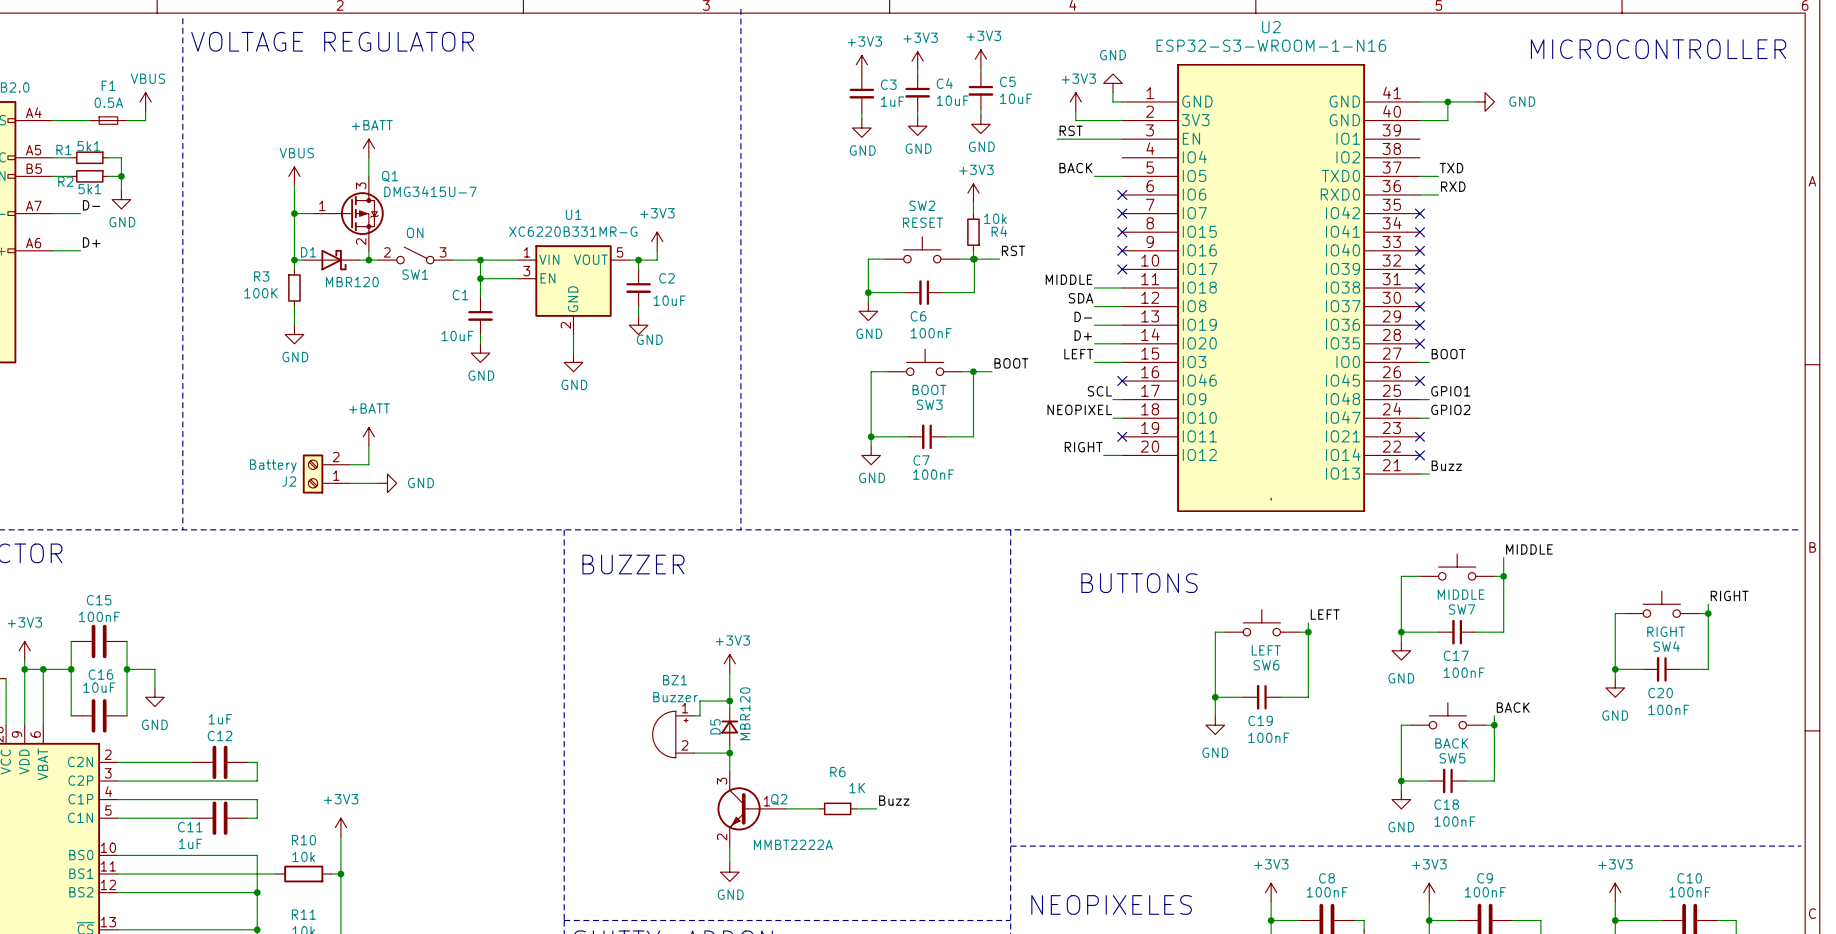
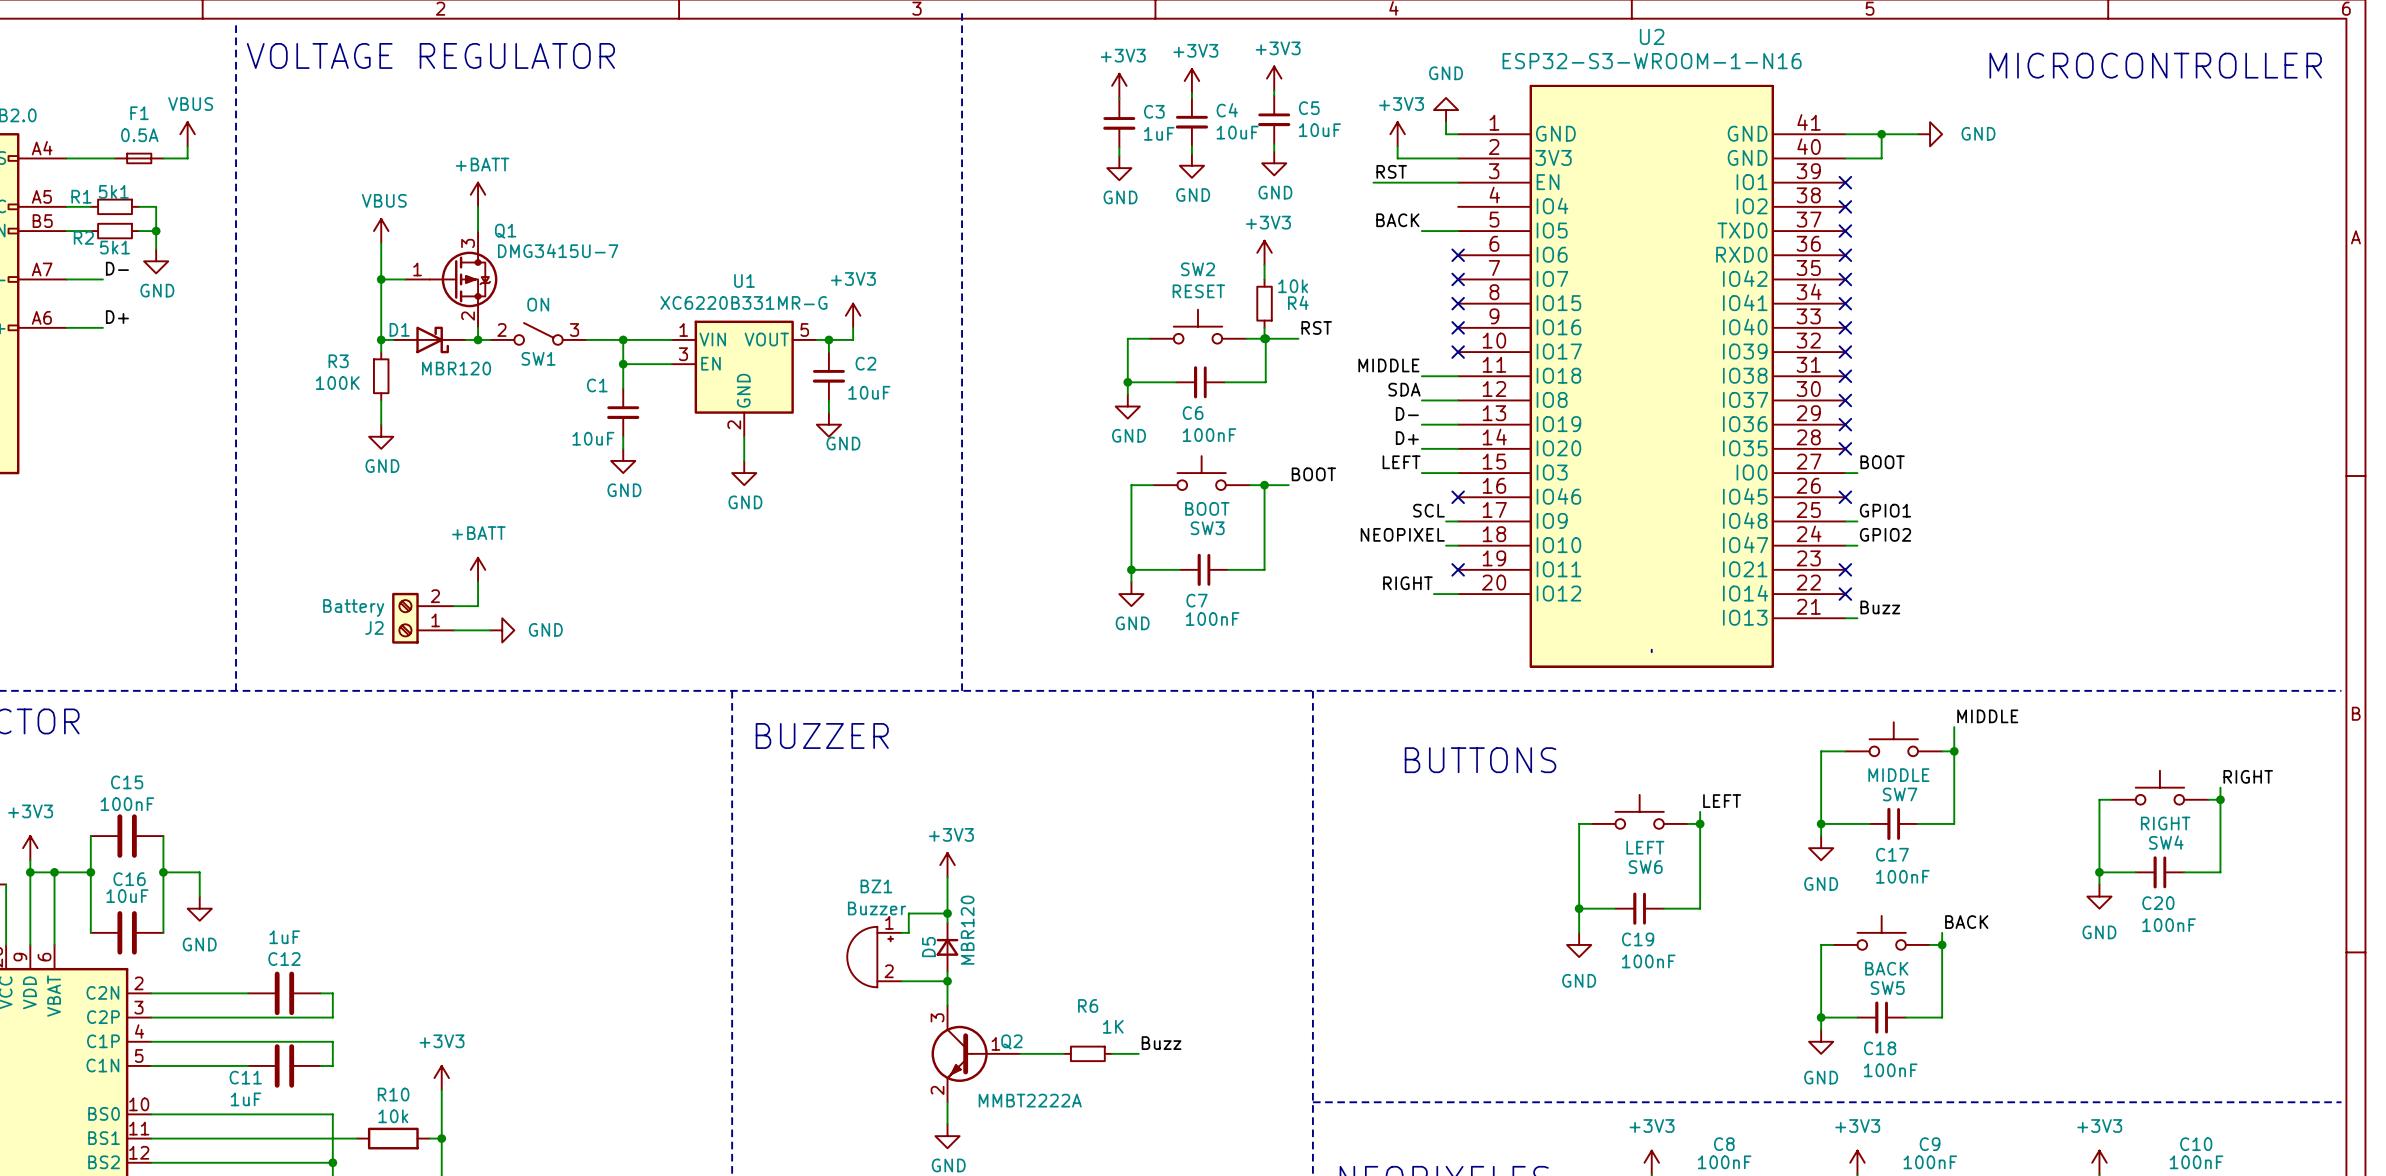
no-connect mark: none -> (1845, 182)
no-connect mark: none -> (1845, 206)
label: TXD (1451, 168) -> none
wire: (1419, 176) (1438, 176) -> none
no-connect mark: none -> (1845, 231)
label: RXD (1453, 186) -> none
wire: (1419, 194) (1438, 194) -> none
no-connect mark: none -> (1845, 255)

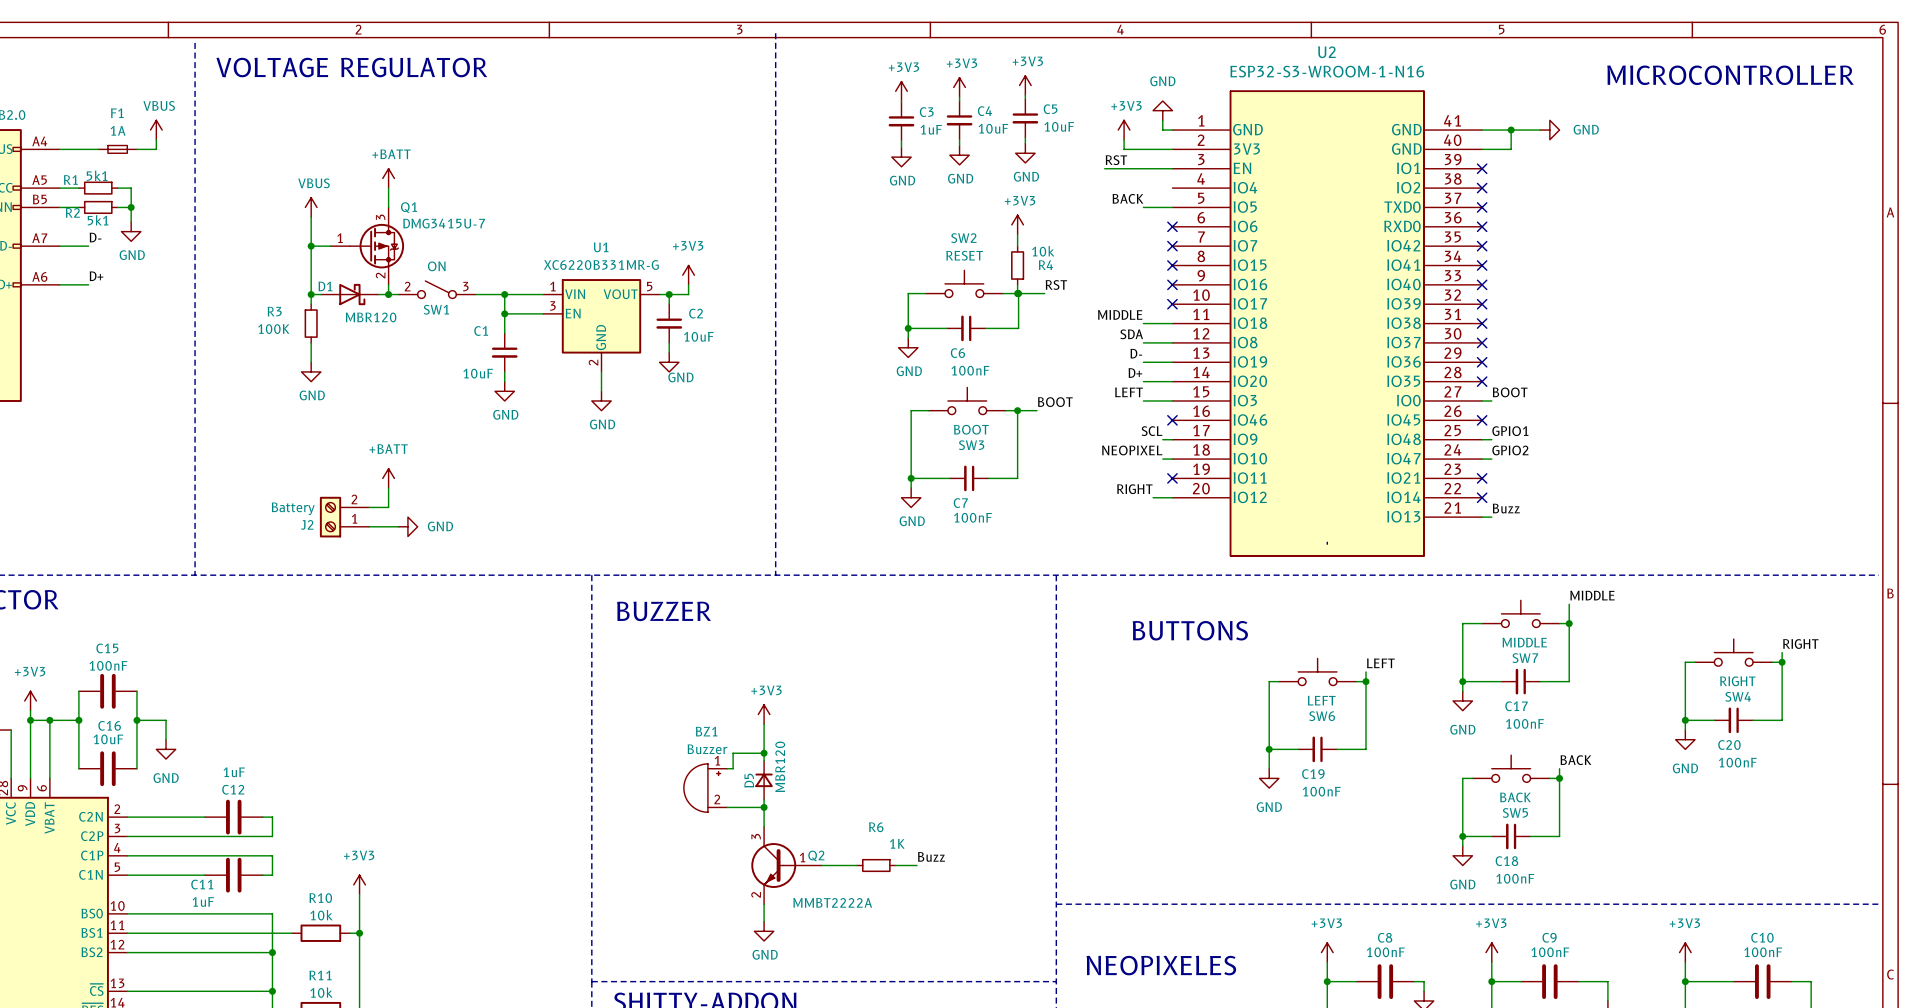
F1 value: 0.5A (139, 135) -> 1A (118, 130)

